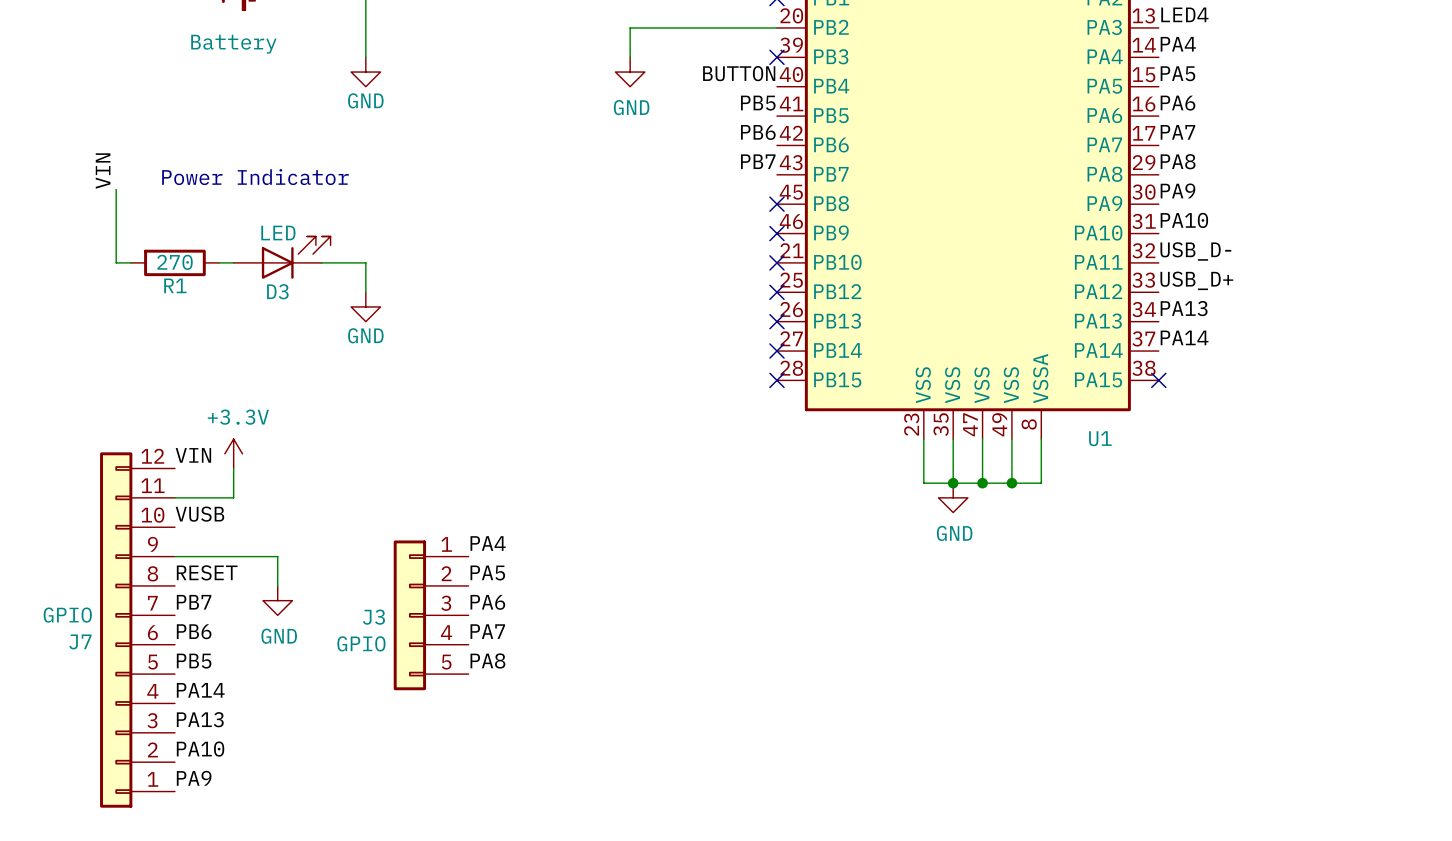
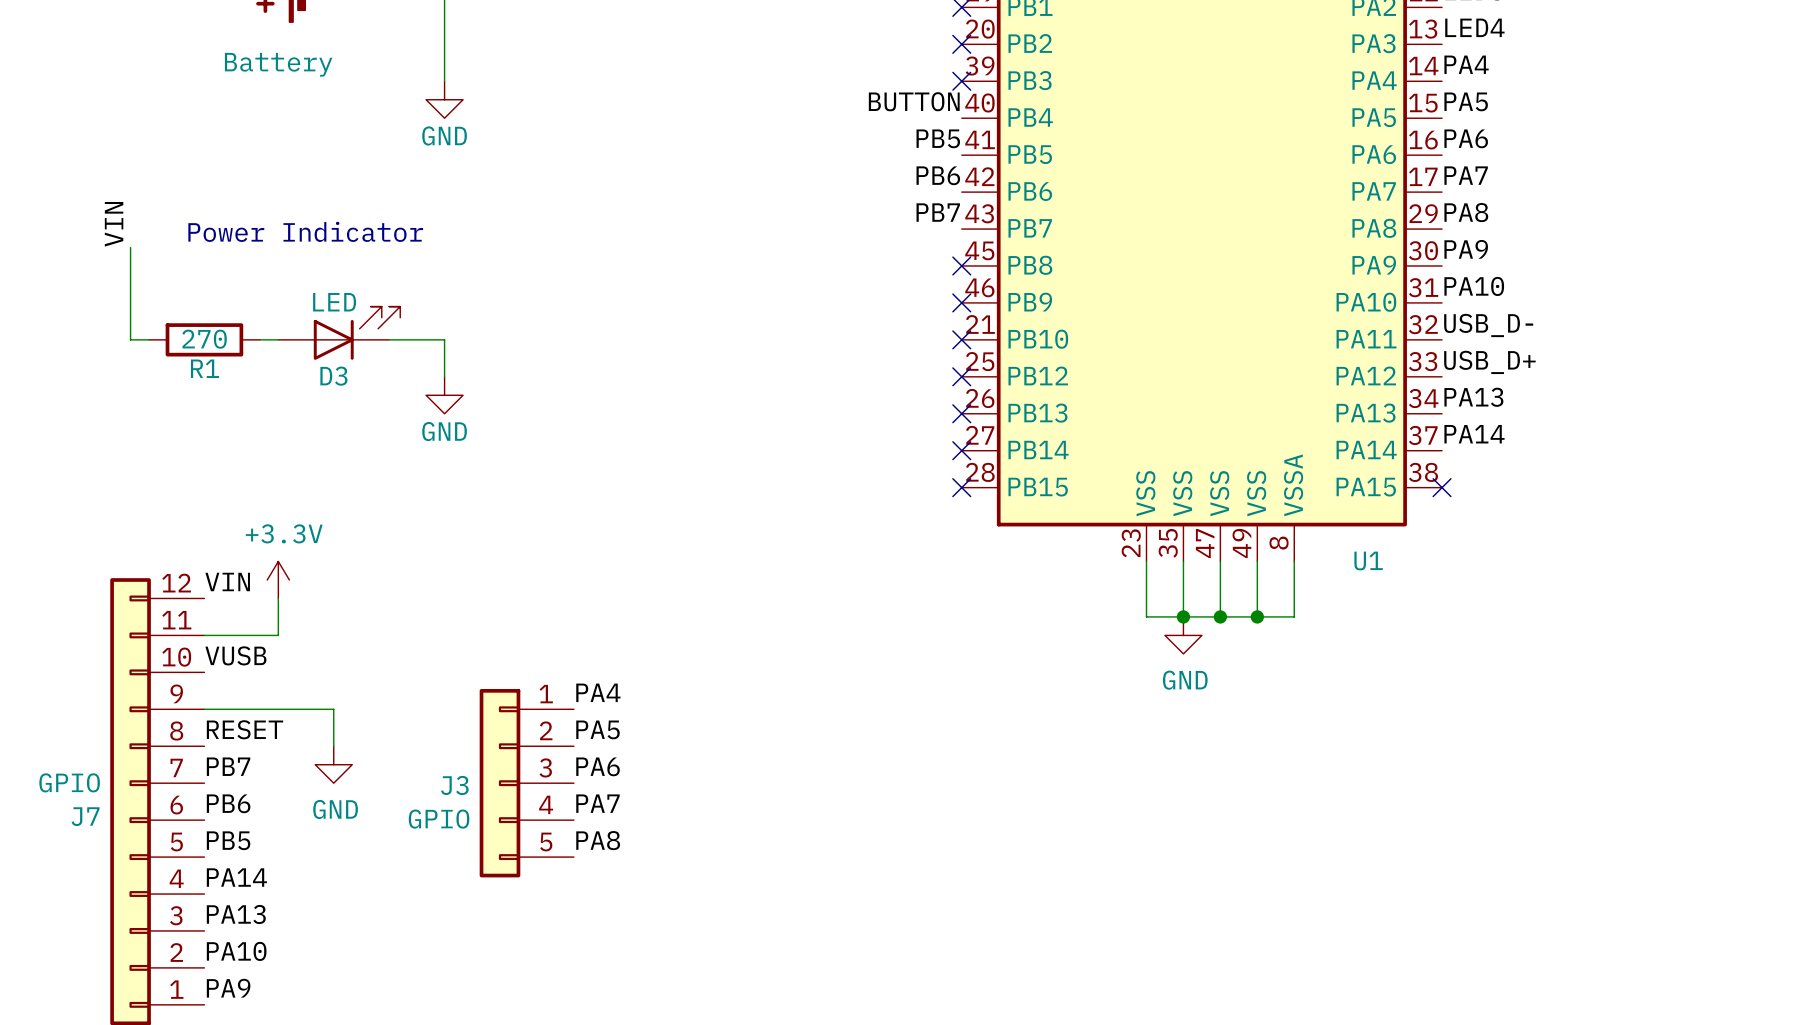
wire: (776, 27) (630, 27) (630, 57) -> none
no-connect mark: none -> (961, 44)
power symbol: GND (630, 72) -> none

